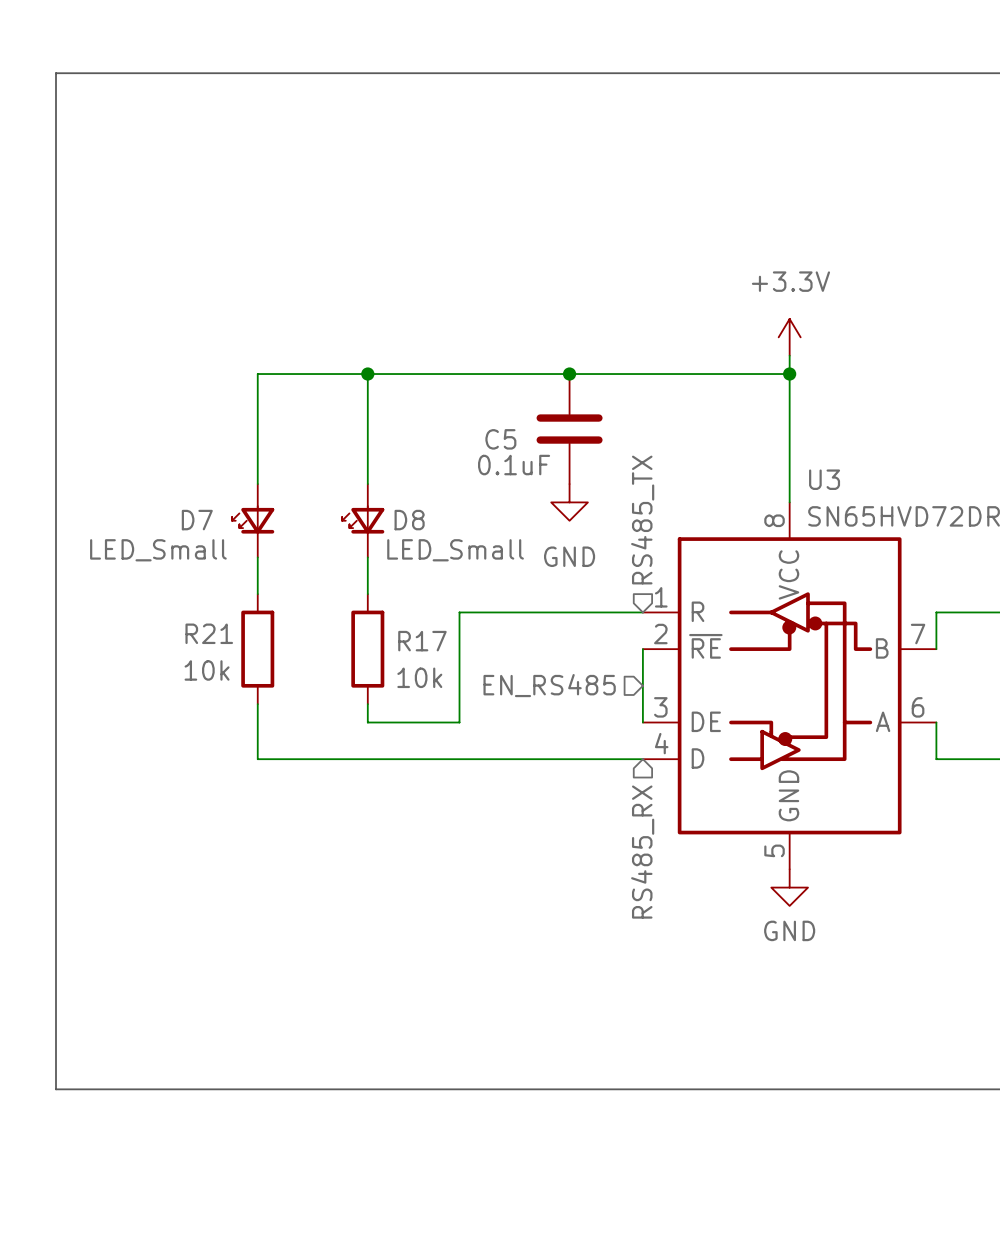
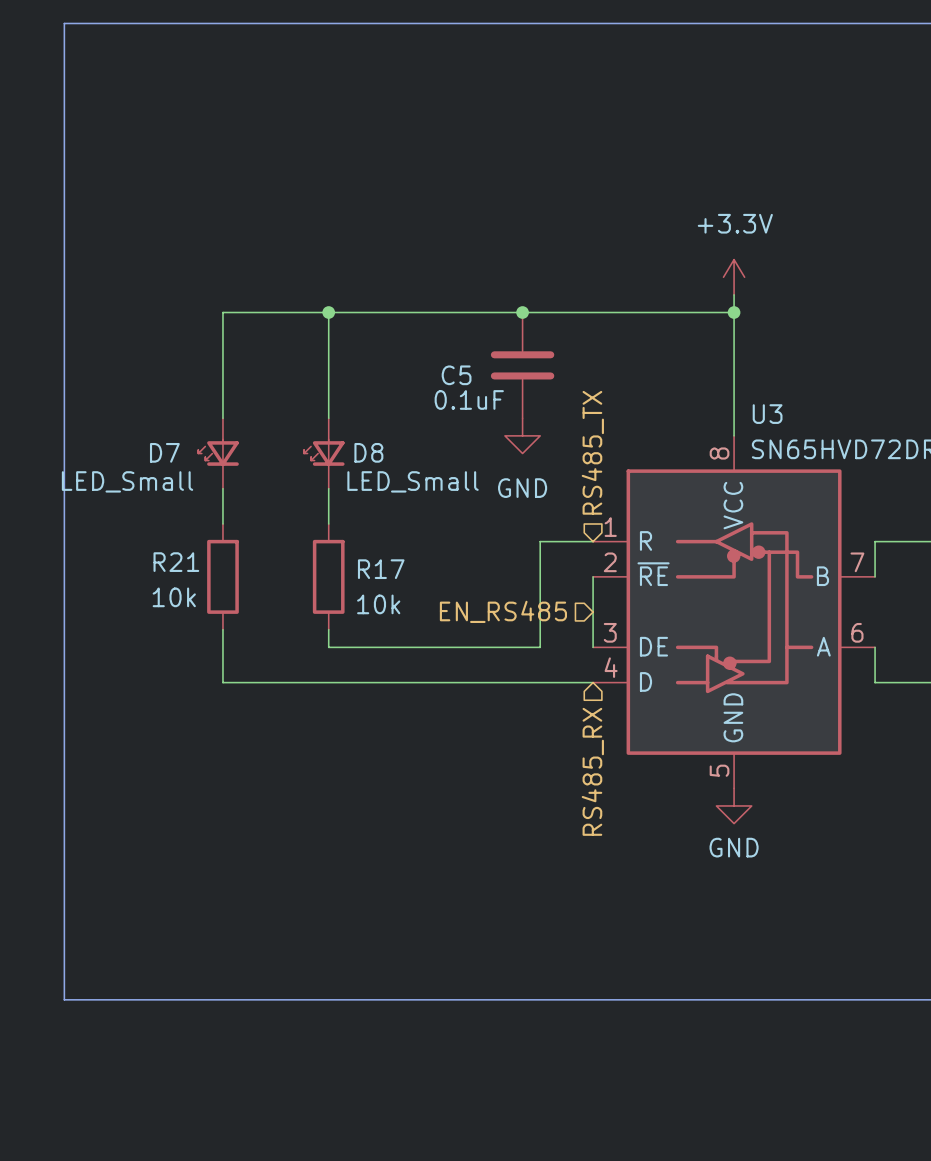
line: (92, 73) (56, 73) (56, 1089) (92, 1089) -> (64, 23) (64, 999)
wire: (587, 612) (459, 612) (459, 722) -> (540, 541) (540, 647) (416, 647)

